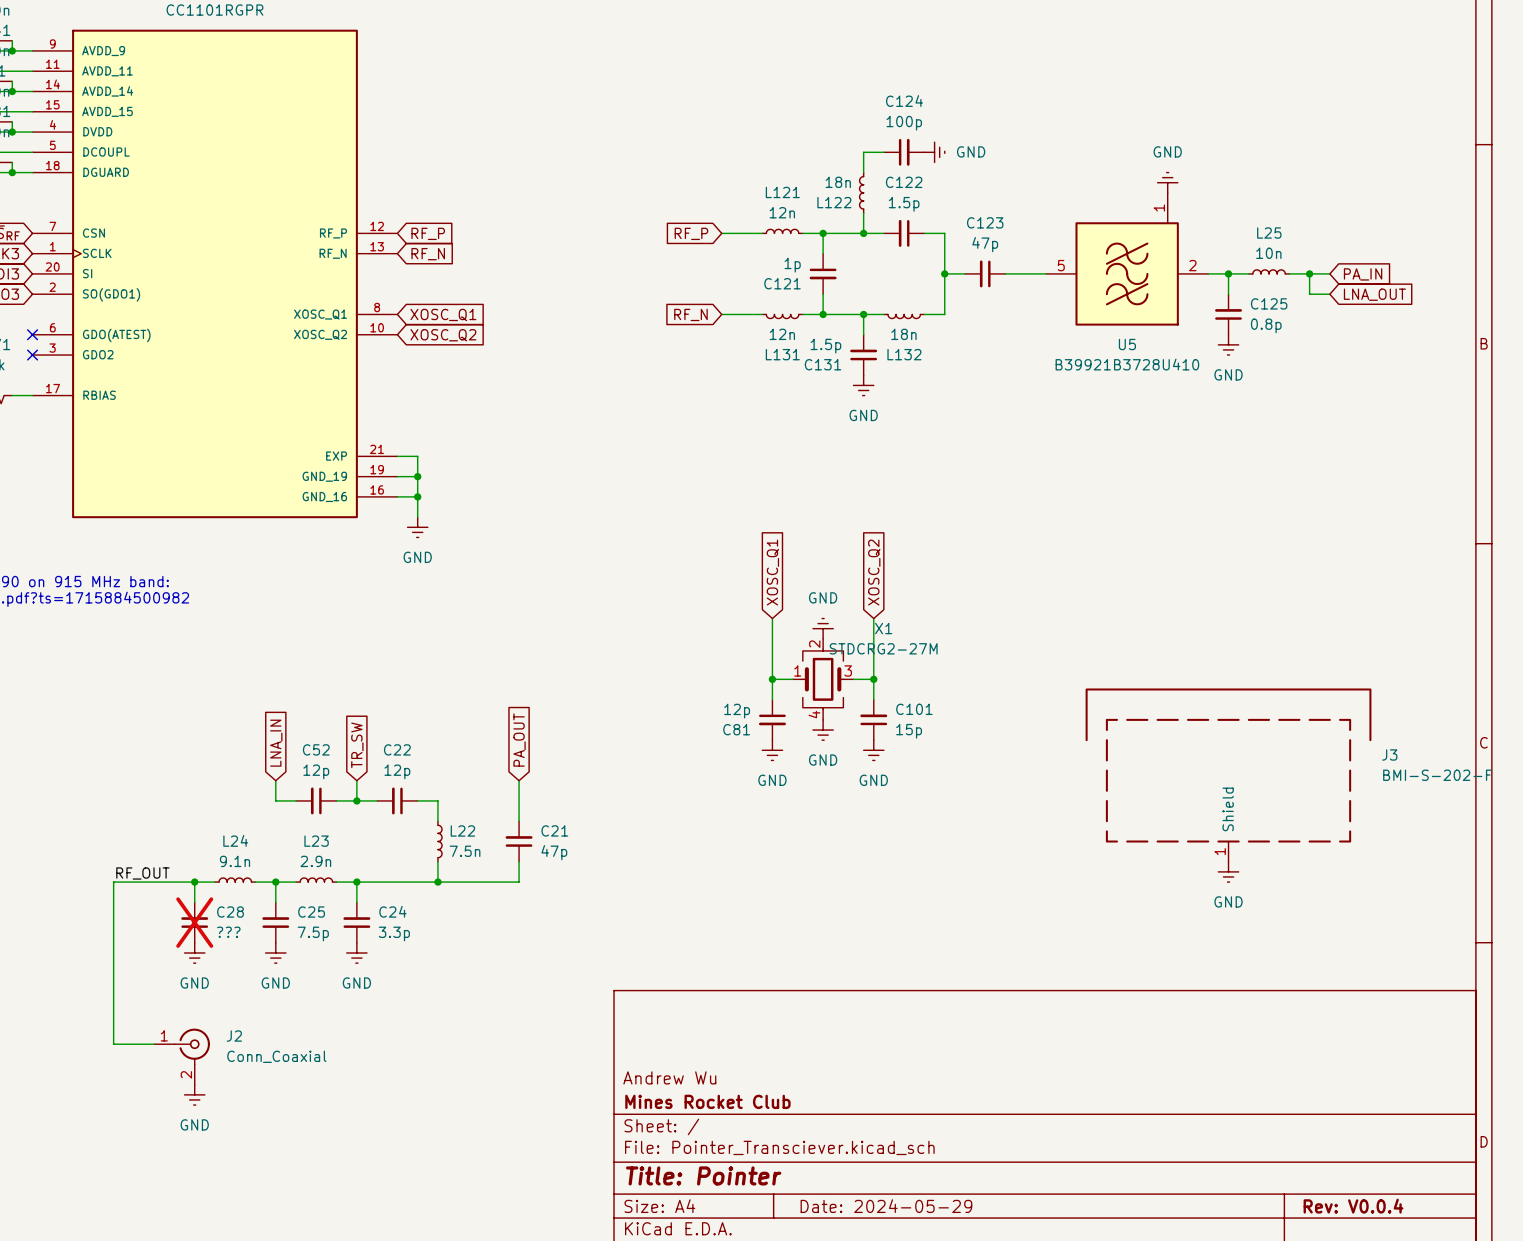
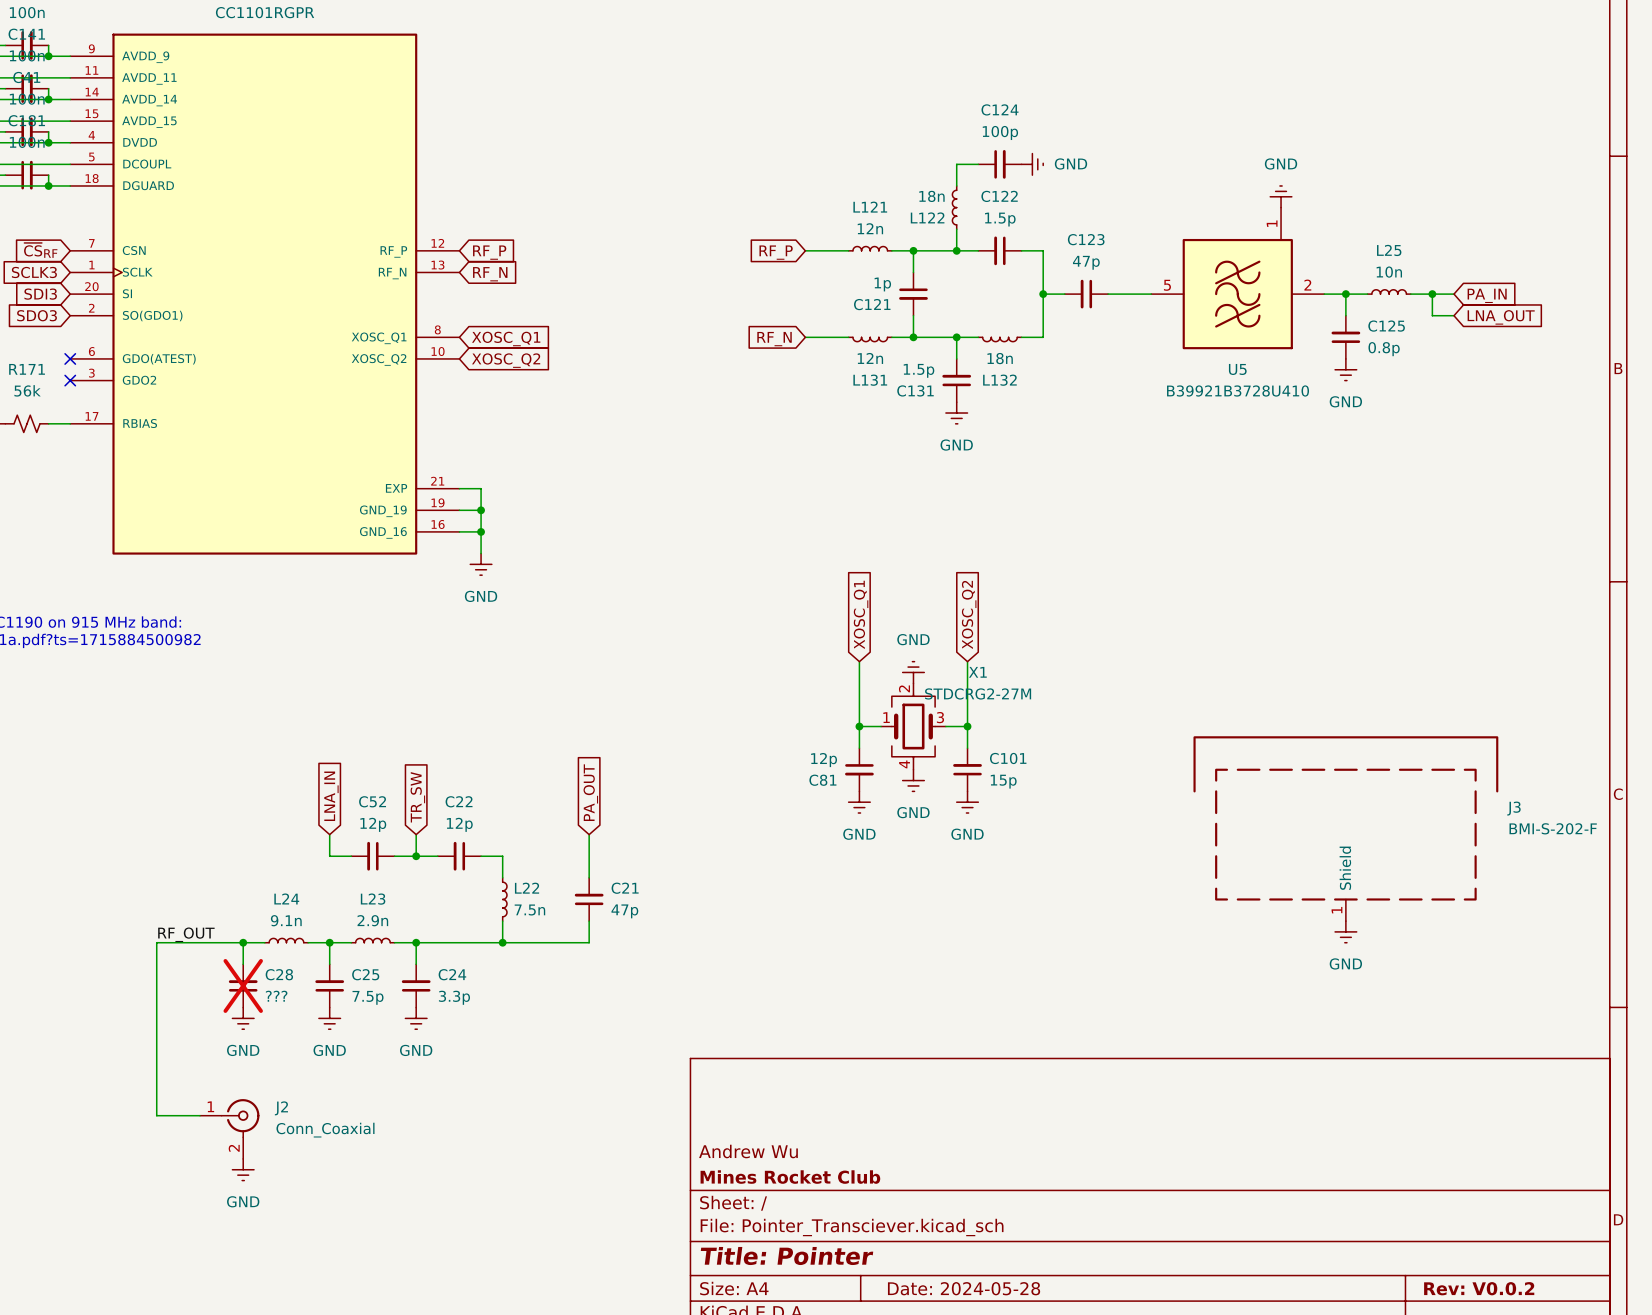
title block: Date: 2024-05-29 (886, 1206) -> Date: 2024-05-28 (964, 1288)
title block: Rev: V0.0.4 (1353, 1206) -> Rev: V0.0.2 (1479, 1288)

